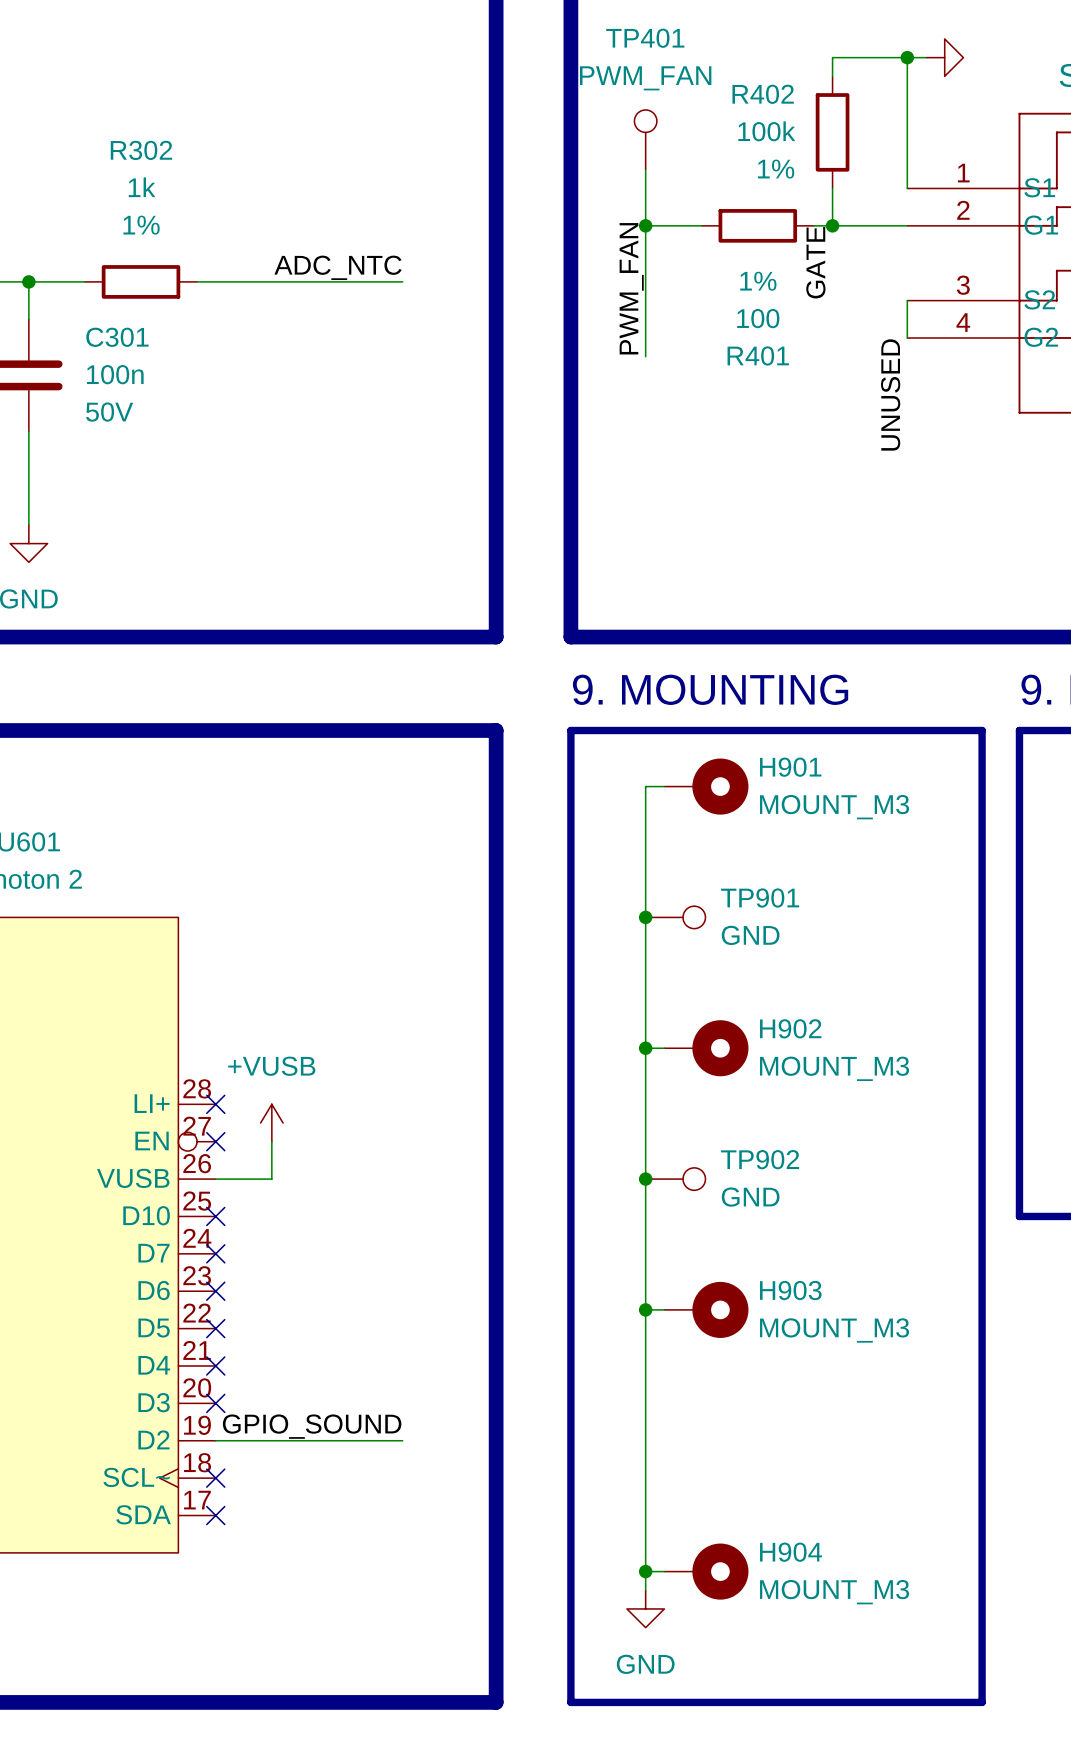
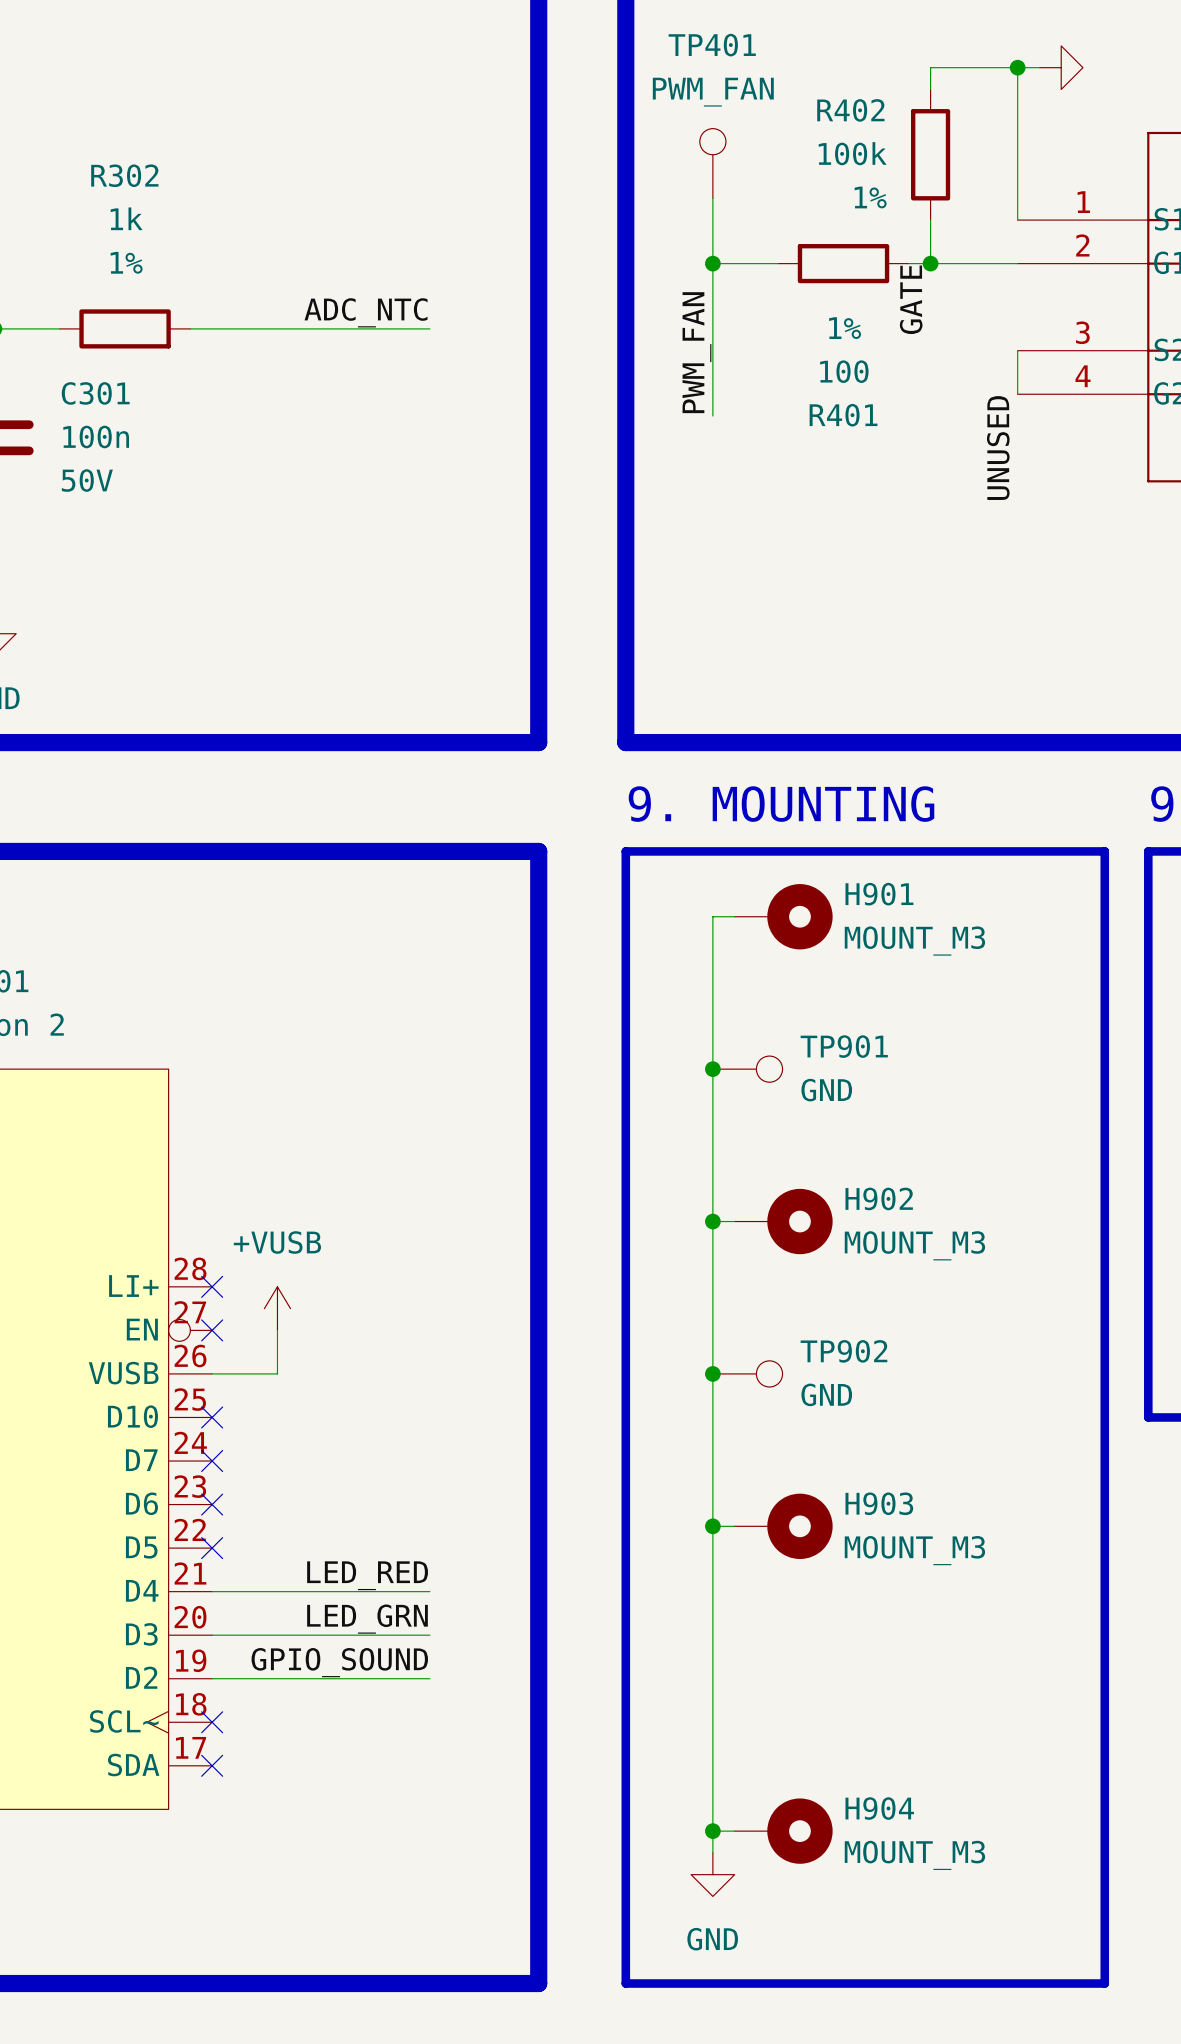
label: none -> LED_RED (367, 1575)
wire: none -> (212, 1591) (429, 1591)
no-connect mark: (215, 1365) -> none
label: none -> LED_GRN (367, 1619)
wire: none -> (212, 1635) (429, 1635)
no-connect mark: (215, 1403) -> none

